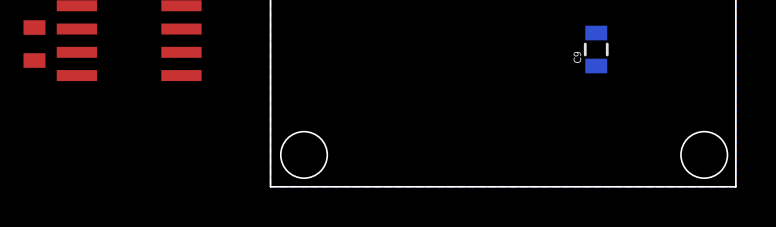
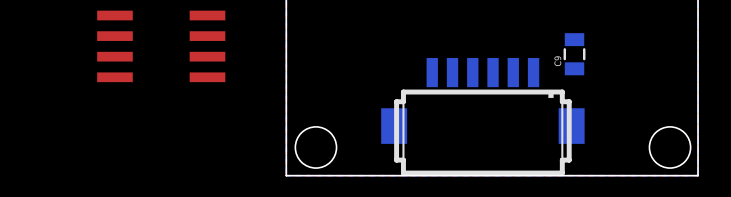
part: (34, 44) -> none
part: none -> (482, 116)

